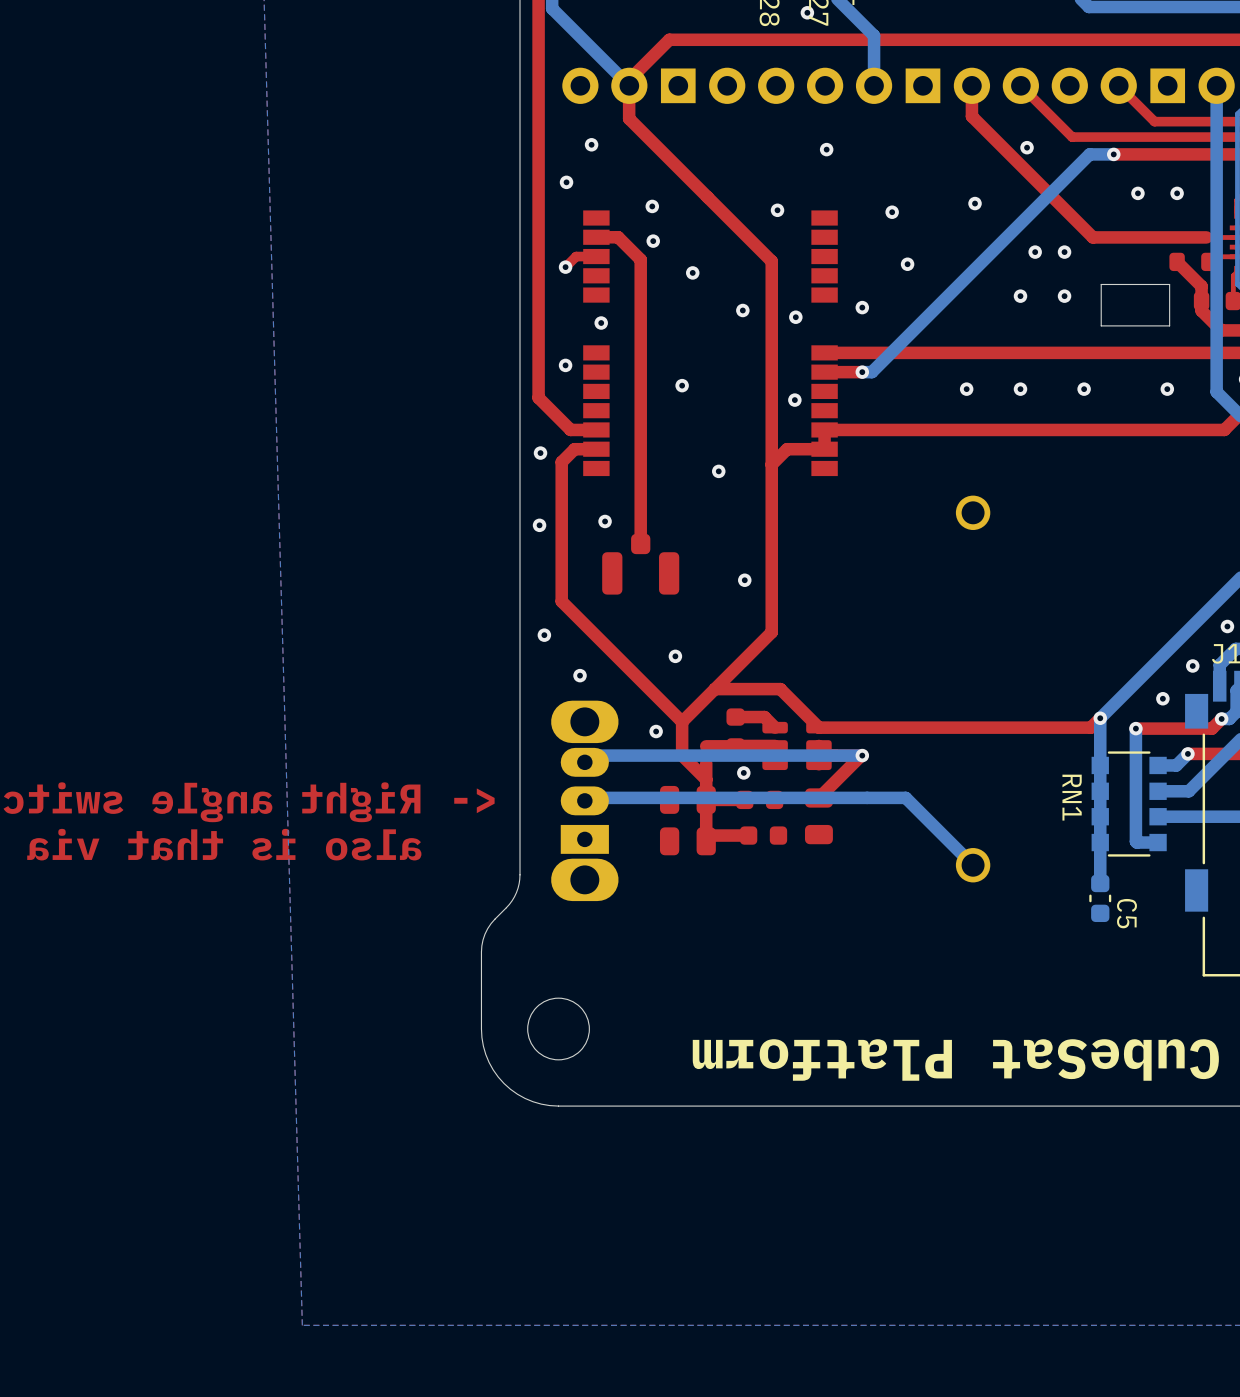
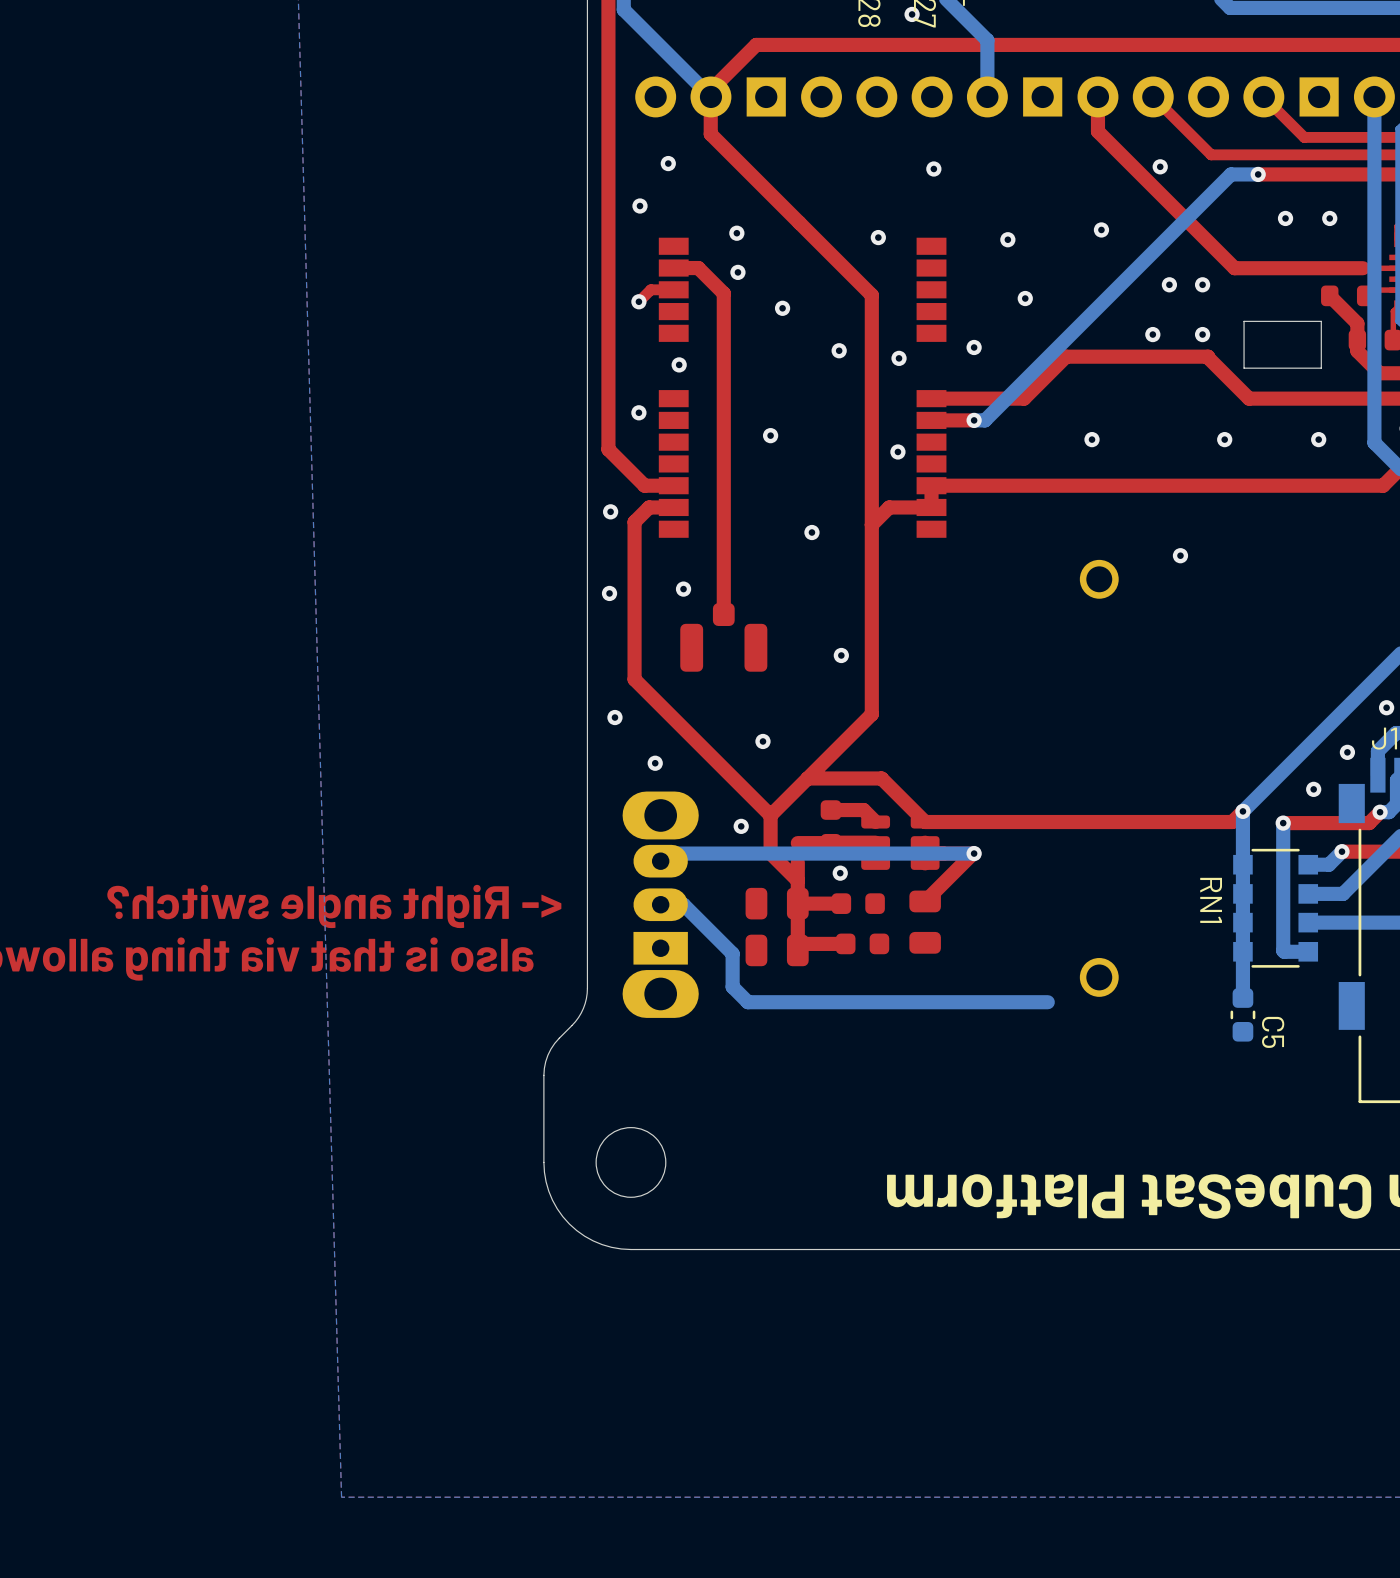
top track: (1105, 352) (906, 352) -> (1249, 398) (1208, 356) (1066, 356) (1024, 398)
via position: (1020, 389) -> (1180, 555)
bottom track: (584, 800) (587, 797) (905, 797) (973, 865) -> (660, 904) (683, 904) (732, 953) (732, 986) (747, 1002) (1047, 1002)

